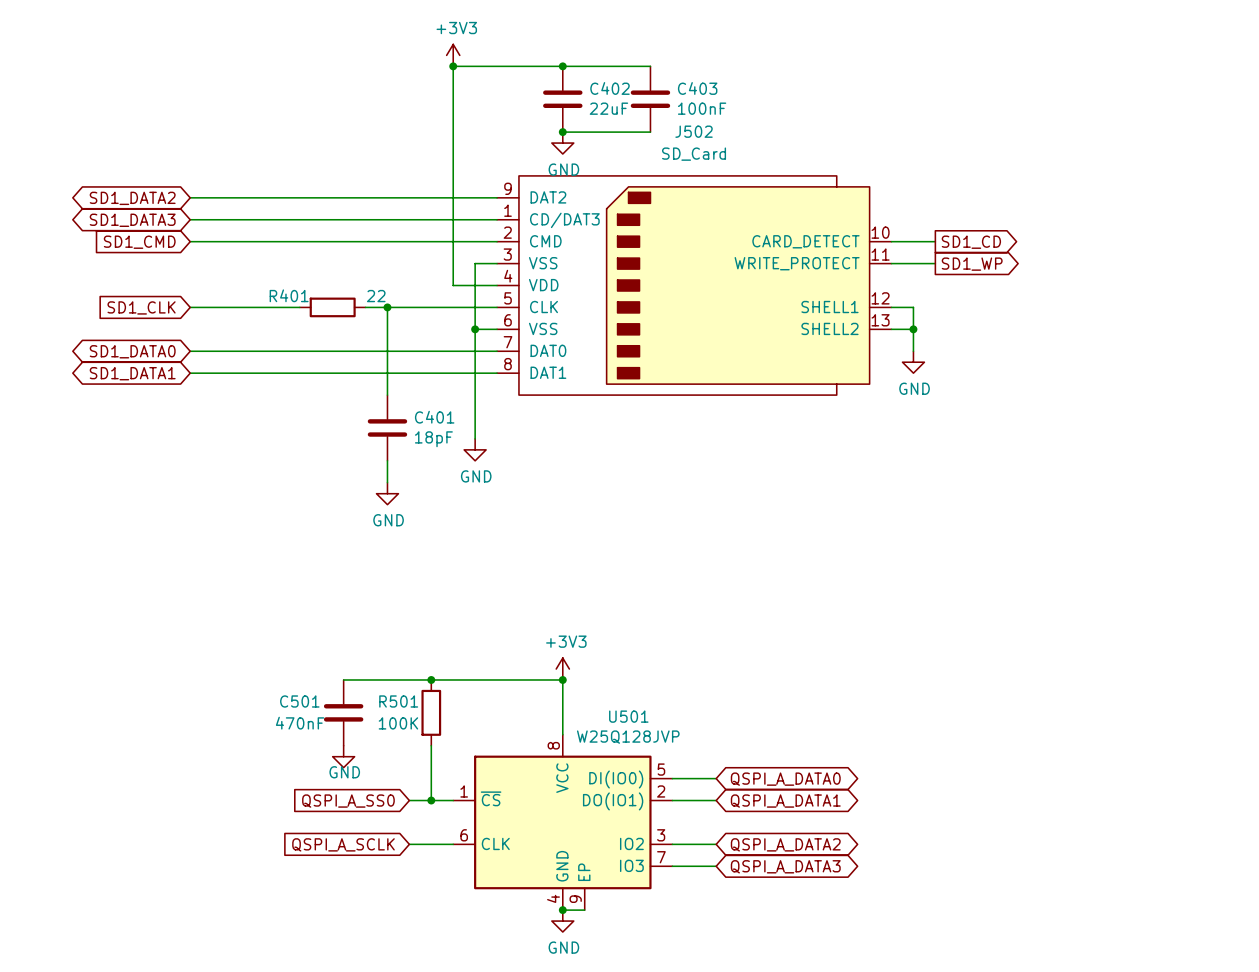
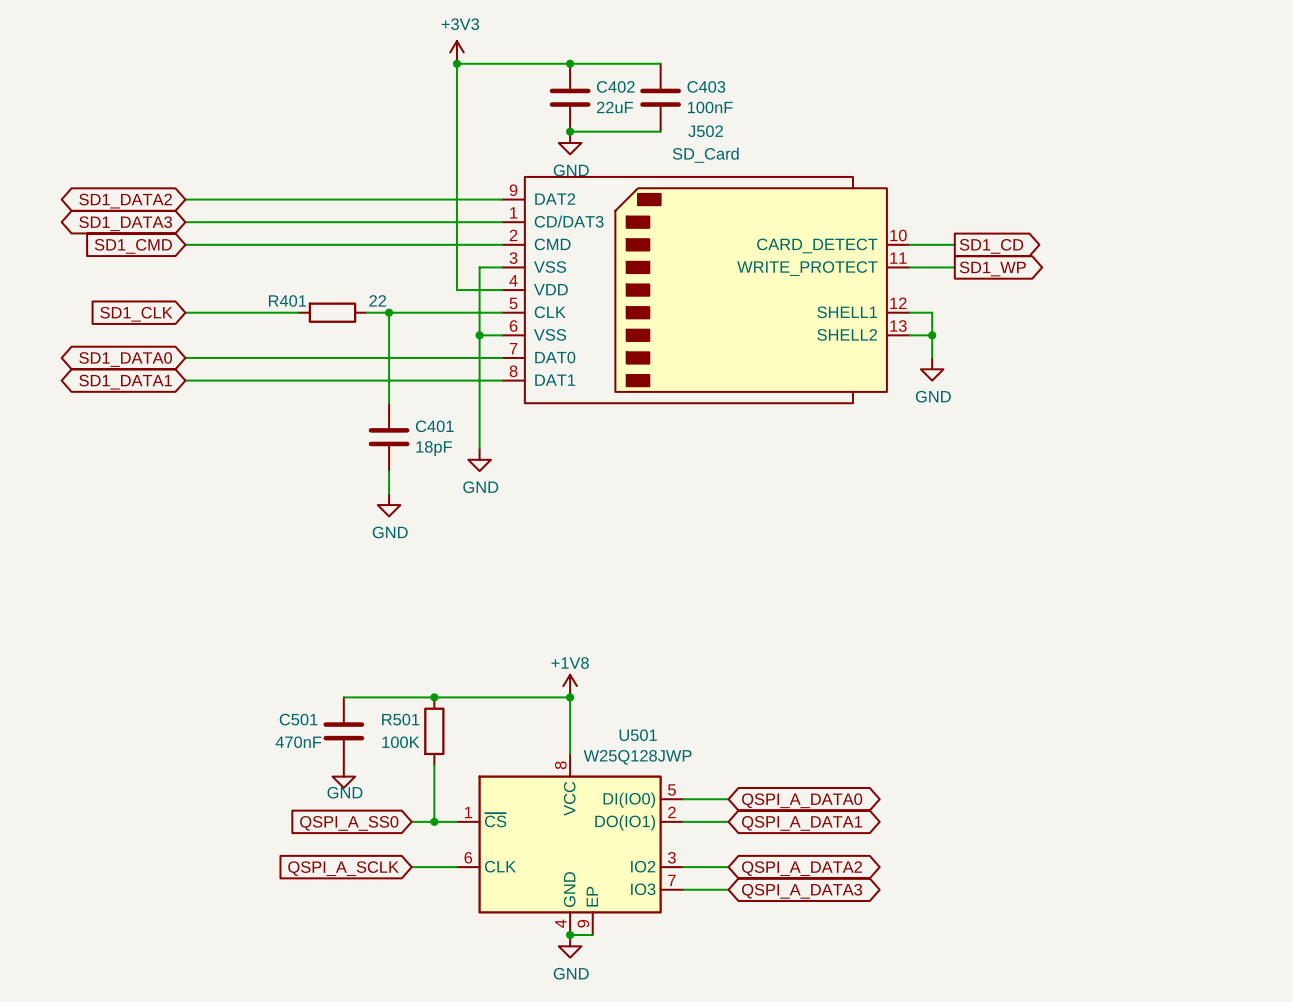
power symbol: +3V3 (562, 669) -> +1V8 (570, 686)
U501 value: W25Q128JVP (628, 737) -> W25Q128JWP (637, 757)

